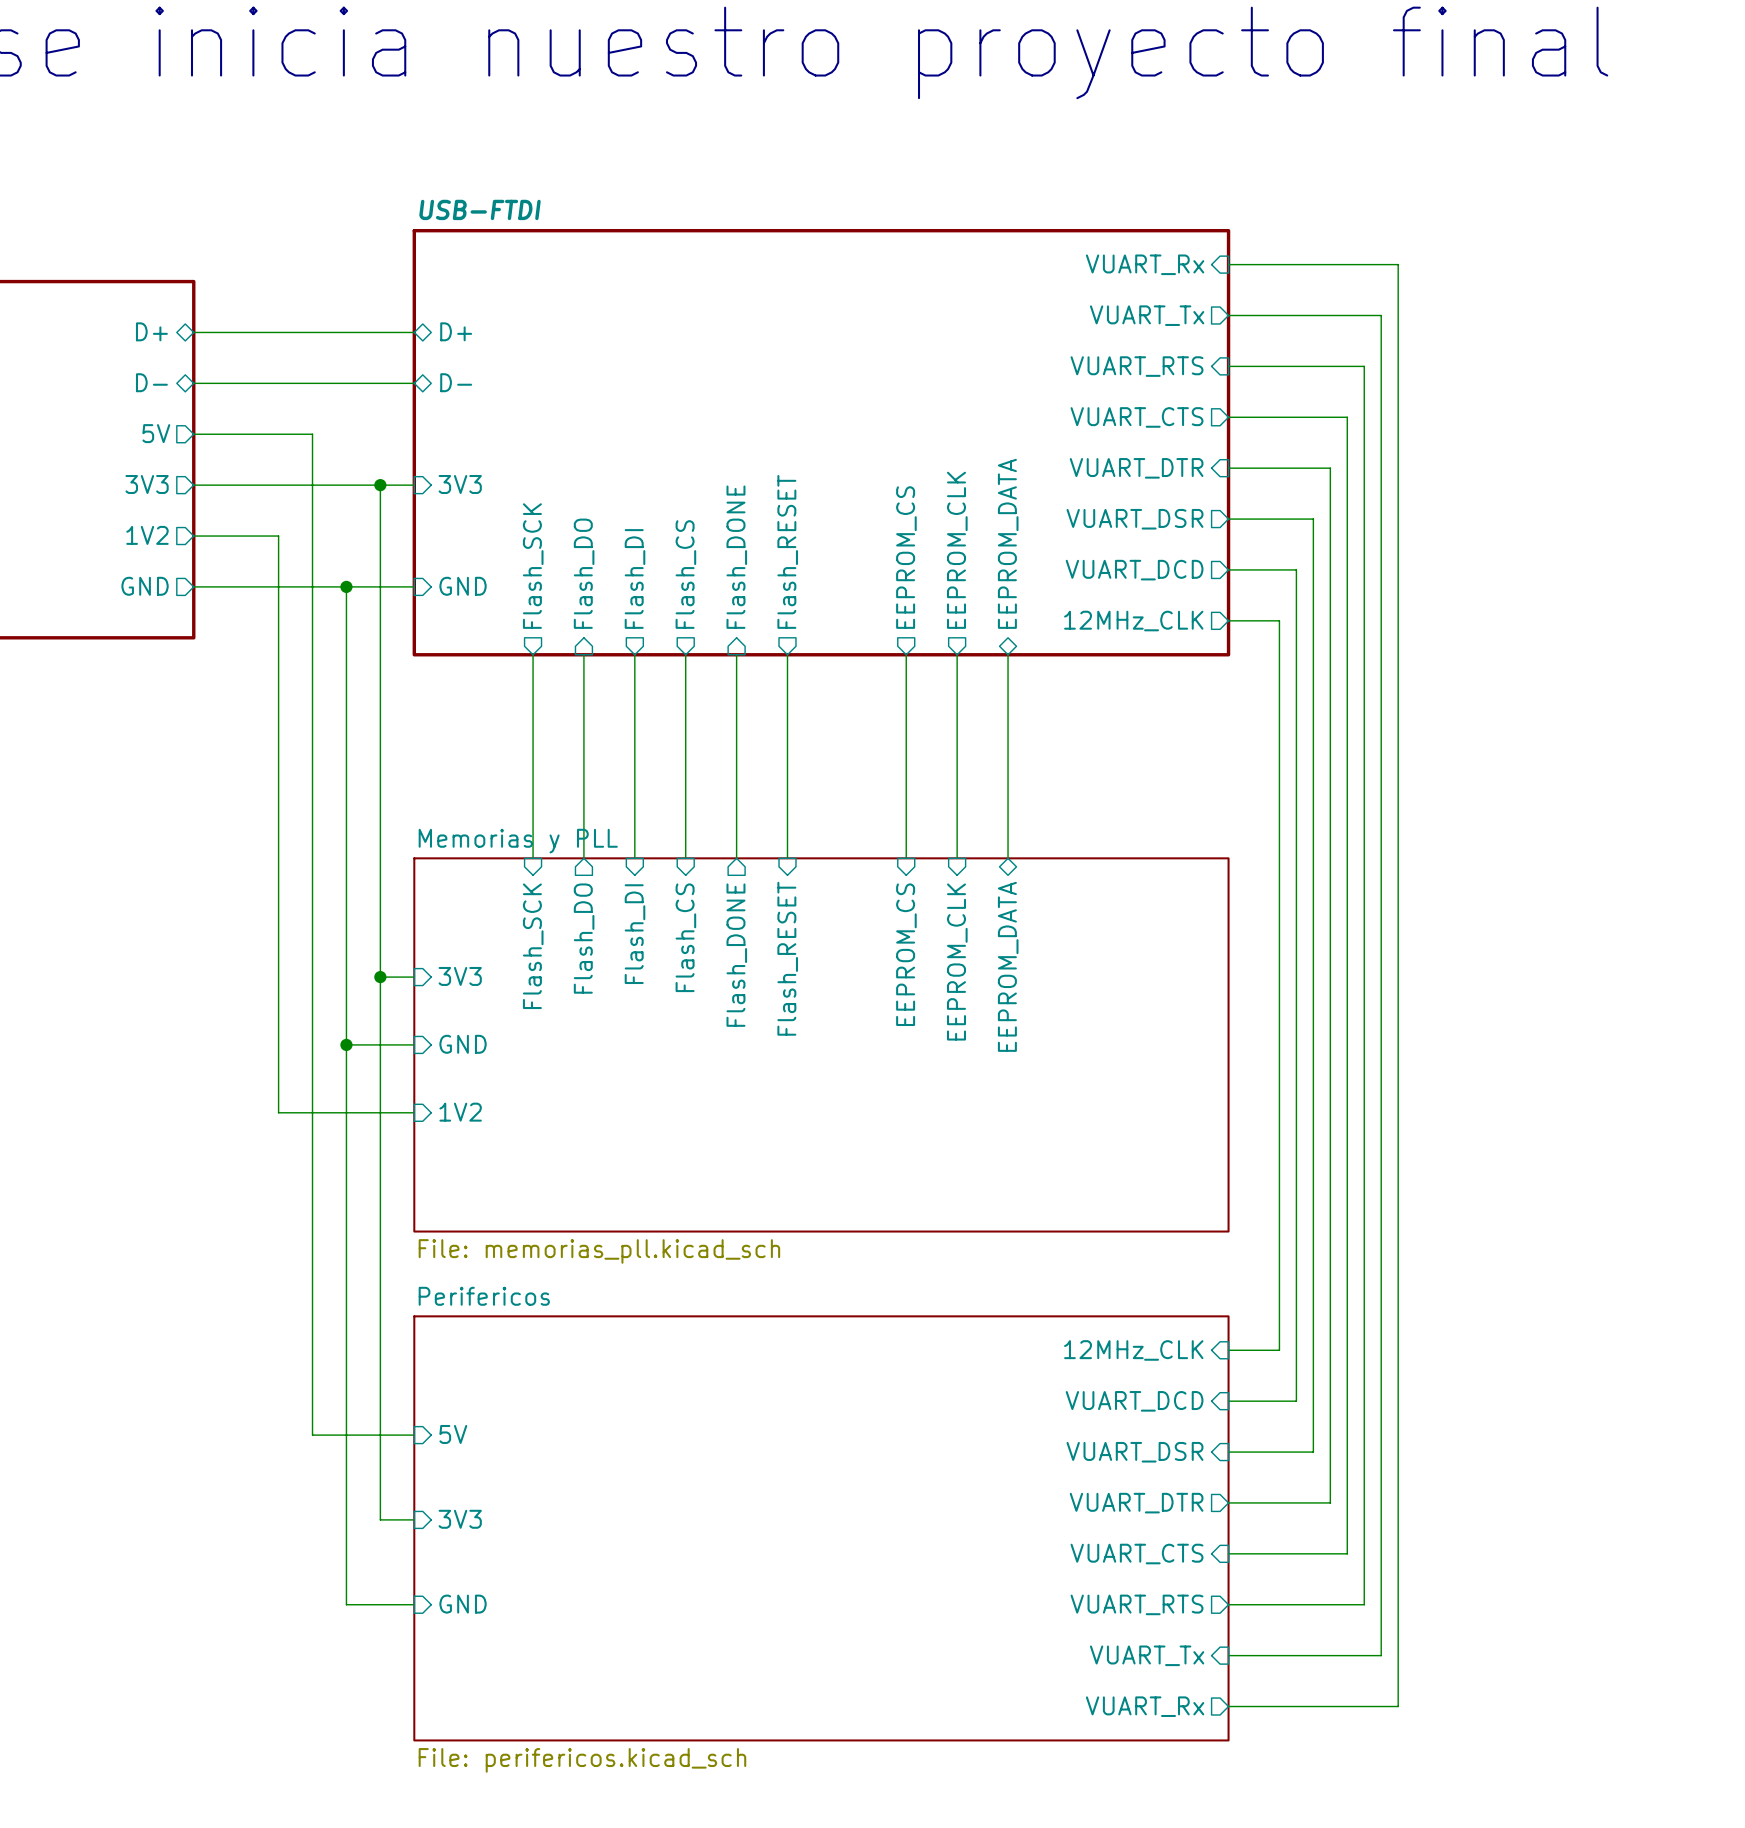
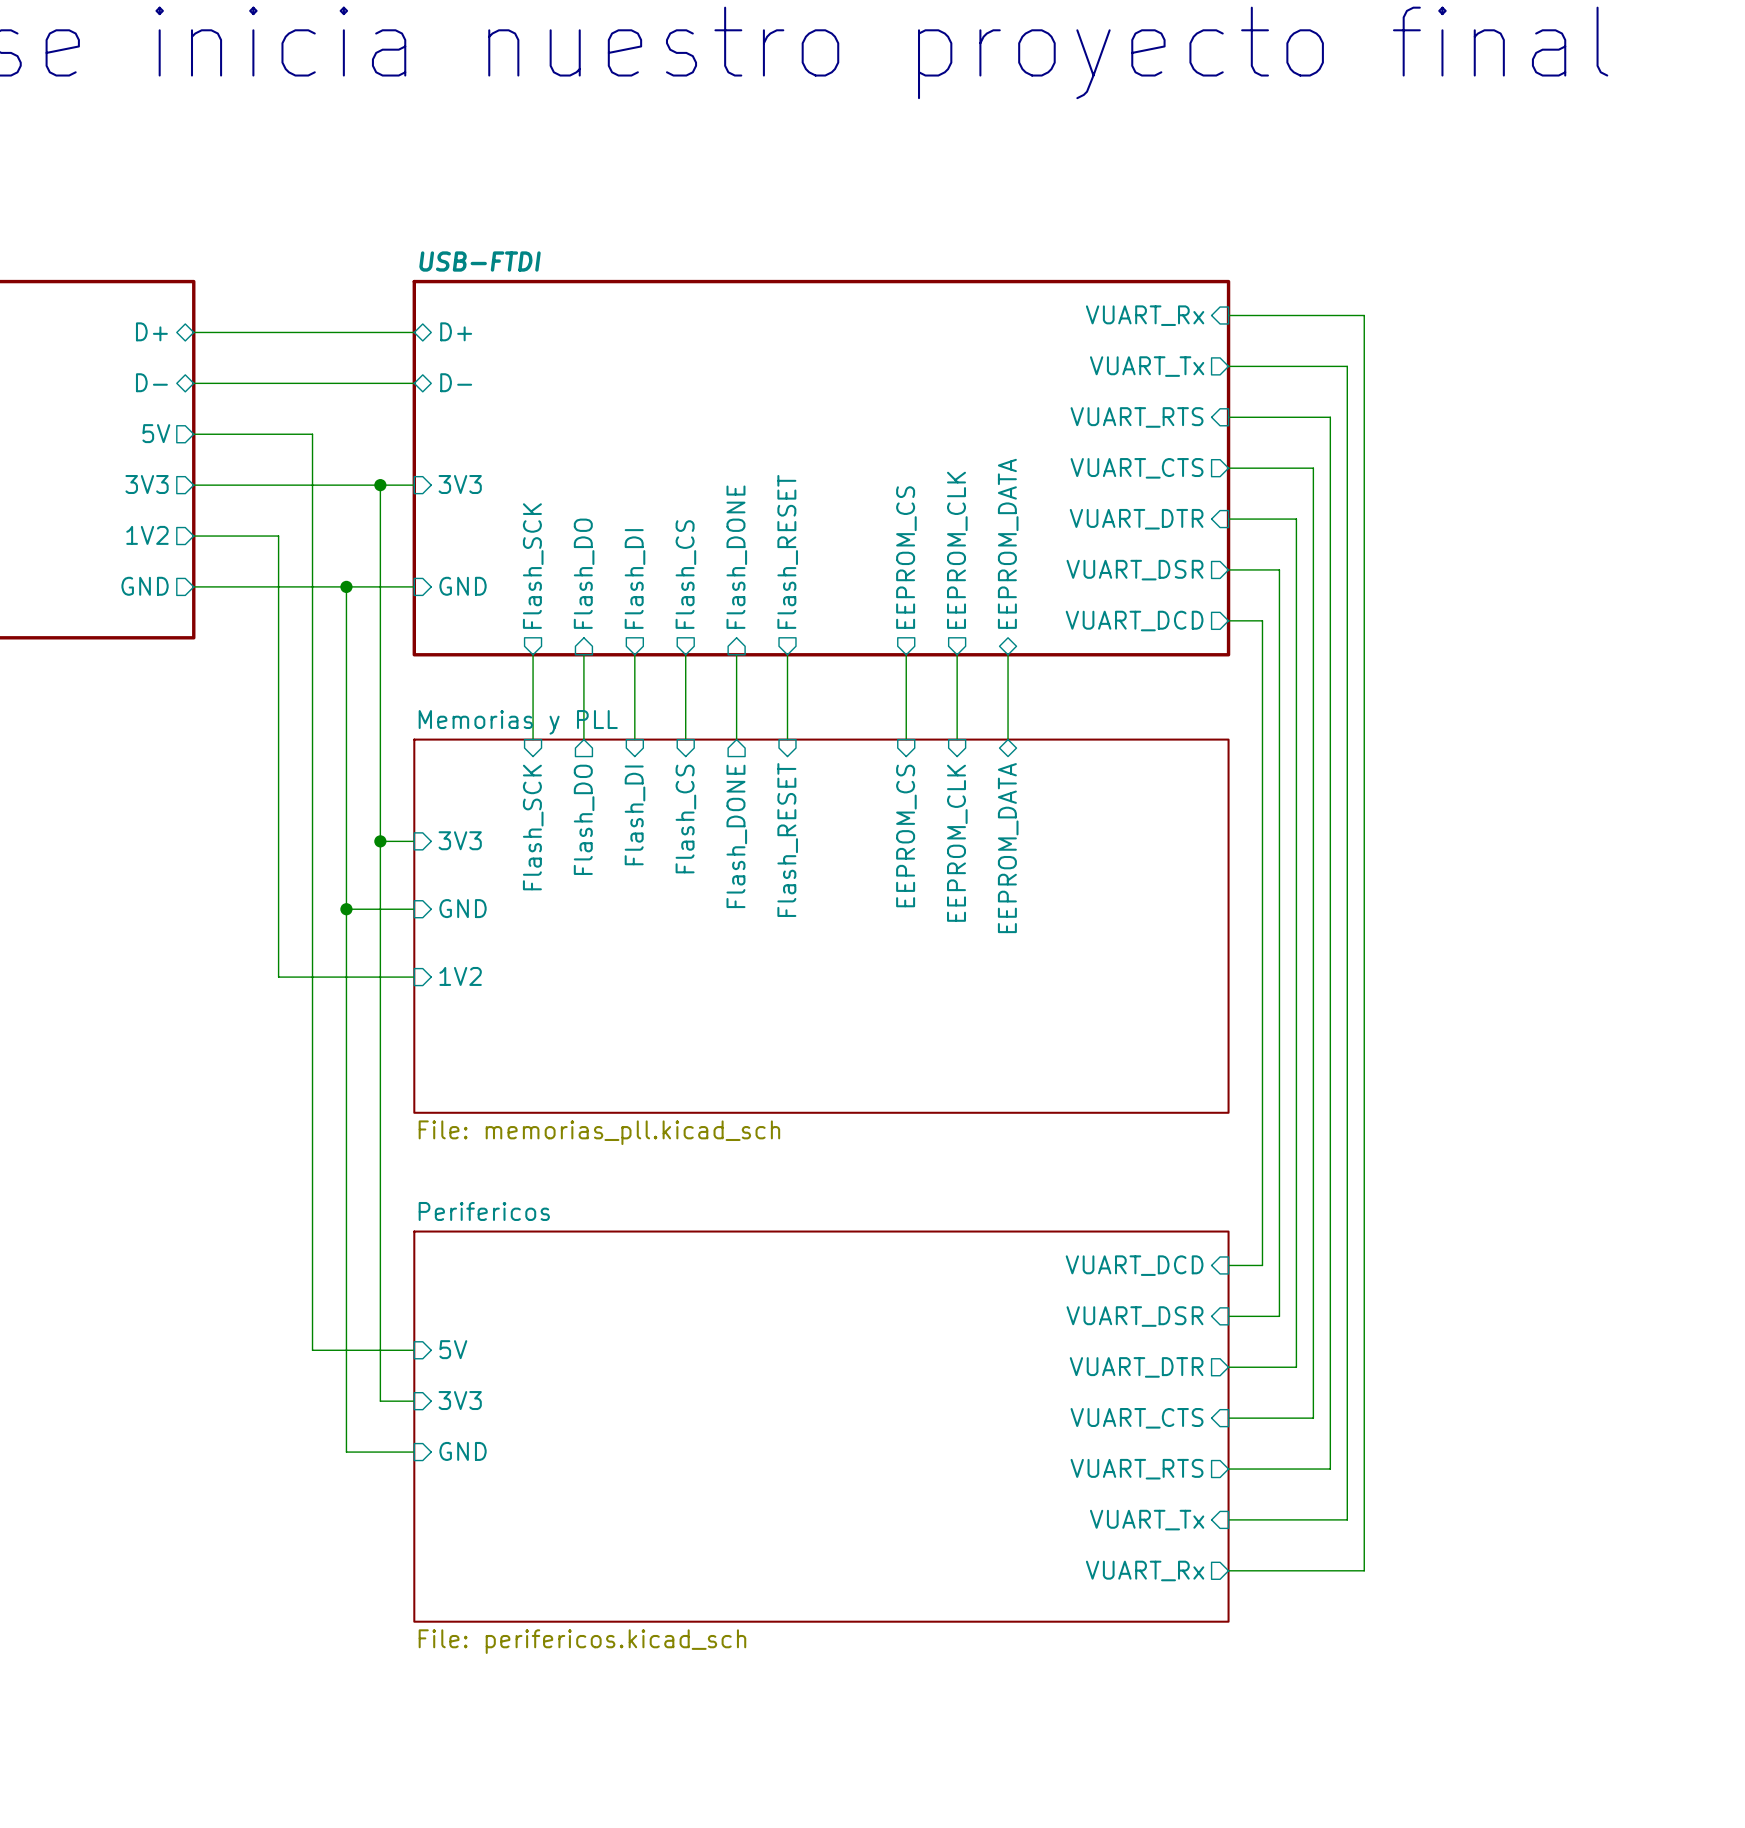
sheet pin: VUART_Rx (1145, 264) -> none
wire: (1228, 264) (1398, 264) (1398, 1706) (1228, 1706) -> none
sheet pin shape: output (1147, 315) -> input (1145, 315)
sheet pin: VUART_Tx (1147, 315) -> VUART_Rx (1145, 315)
wire: (1364, 315) (1381, 315) (1381, 1655) (1228, 1655) -> (1364, 315) (1364, 366)
sheet pin shape: input (1137, 366) -> output (1147, 366)
sheet pin: VUART_RTS (1137, 366) -> VUART_Tx (1147, 366)
wire: (1347, 366) (1364, 366) -> (1347, 366) (1347, 417)
sheet pin shape: output (1137, 417) -> input (1137, 417)
sheet pin: VUART_CTS (1137, 417) -> VUART_RTS (1137, 417)
wire: (1330, 417) (1347, 417) -> (1330, 417) (1330, 468)
sheet USB-FTDI: (821, 442) -> none
sheet USB-FTDI: none -> (821, 468)
sheet pin shape: input (1136, 468) -> output (1137, 468)
sheet pin: VUART_DTR (1136, 468) -> VUART_CTS (1137, 468)
wire: (1313, 468) (1330, 468) -> (1313, 468) (1313, 519)
sheet pin shape: output (1134, 519) -> input (1136, 519)
sheet pin: VUART_DSR (1134, 519) -> VUART_DTR (1136, 519)
wire: (1296, 519) (1313, 519) -> (1296, 519) (1296, 569)
wire: (1279, 569) (1296, 569) -> none
sheet pin: VUART_DCD (1134, 570) -> VUART_DSR (1134, 570)
wire: (1262, 620) (1279, 620) -> (1279, 569) (1279, 620)
wire: none -> (1262, 620) (1262, 1265) (1228, 1265)
sheet pin: 12MHz_CLK (1133, 621) -> VUART_DCD (1134, 621)
wire: (533, 739) (533, 858) -> none
wire: (583, 739) (583, 858) -> none
wire: (634, 739) (634, 858) -> none
wire: (685, 739) (685, 858) -> none
wire: (736, 739) (736, 858) -> none
wire: (787, 739) (787, 858) -> none
wire: (906, 739) (906, 858) -> none
wire: (957, 739) (957, 858) -> none
wire: (1008, 739) (1008, 858) -> none
sheet pin: none -> 3V3 (460, 840)
wire: none -> (380, 841) (414, 841)
junction: none -> (380, 841)
junction: none -> (346, 909)
sheet pin position: Flash_DI (635, 934) -> Flash_DI (635, 815)
sheet pin position: Flash_CS (685, 937) -> Flash_CS (685, 819)
sheet pin position: Flash_DO (584, 938) -> Flash_DO (584, 819)
sheet pin position: Flash_SCK (533, 946) -> Flash_SCK (533, 827)
sheet pin position: EEPROM_CS (906, 954) -> EEPROM_CS (906, 835)
sheet pin position: Flash_DONE (736, 955) -> Flash_DONE (736, 836)
sheet pin position: Flash_RESET (787, 958) -> Flash_RESET (787, 840)
sheet pin position: EEPROM_CLK (957, 961) -> EEPROM_CLK (957, 843)
sheet pin position: EEPROM_DATA (1008, 966) -> EEPROM_DATA (1008, 848)
sheet pin: 3V3 (460, 976) -> 1V2 (460, 976)
wire: (278, 977) (278, 1112) (414, 1112) -> (278, 977) (380, 977)
junction: (380, 977) -> none
wire: (346, 1044) (414, 1044) -> (346, 909) (414, 909)
junction: (346, 1044) -> none
sheet pin position: GND (463, 1044) -> GND (463, 908)
sheet Memorias y PLL position: (821, 1044) -> (821, 926)
sheet pin: 1V2 (460, 1112) -> none
wire: (1279, 1316) (1279, 1350) (1228, 1350) -> (1279, 1316) (1228, 1316)
wire: (312, 1350) (312, 1435) (414, 1435) -> (312, 1350) (414, 1350)
sheet pin: 12MHz_CLK (1133, 1350) -> none
wire: (1296, 1367) (1296, 1401) (1228, 1401) -> (1296, 1367) (1228, 1367)
wire: (380, 1401) (380, 1519) (414, 1519) -> (380, 1401) (414, 1401)
sheet pin position: VUART_DCD (1134, 1401) -> VUART_DCD (1134, 1265)
wire: (1313, 1418) (1313, 1452) (1228, 1452) -> (1313, 1418) (1228, 1418)
sheet Perifericos: none -> File: perifericos.kicad_sch (821, 1426)
sheet pin position: 5V (453, 1434) -> 5V (453, 1349)
wire: (346, 1452) (346, 1604) (414, 1604) -> (346, 1452) (414, 1452)
sheet pin position: VUART_DSR (1134, 1452) -> VUART_DSR (1134, 1316)
wire: (1330, 1469) (1330, 1502) (1228, 1502) -> (1330, 1469) (1228, 1469)
sheet pin position: VUART_DTR (1136, 1503) -> VUART_DTR (1136, 1367)
sheet pin position: 3V3 (460, 1519) -> 3V3 (460, 1400)
wire: (1347, 1519) (1347, 1553) (1228, 1553) -> (1347, 1519) (1228, 1519)
sheet Perifericos: File: perifericos.kicad_sch (821, 1528) -> none
sheet pin position: VUART_CTS (1137, 1554) -> VUART_CTS (1137, 1418)
wire: (1364, 1570) (1364, 1604) (1228, 1604) -> (1364, 1570) (1228, 1570)
sheet pin position: GND (463, 1604) -> GND (463, 1451)
sheet pin position: VUART_RTS (1137, 1604) -> VUART_RTS (1137, 1469)
sheet pin position: VUART_Tx (1147, 1655) -> VUART_Tx (1147, 1520)
sheet pin position: VUART_Rx (1145, 1706) -> VUART_Rx (1145, 1570)

